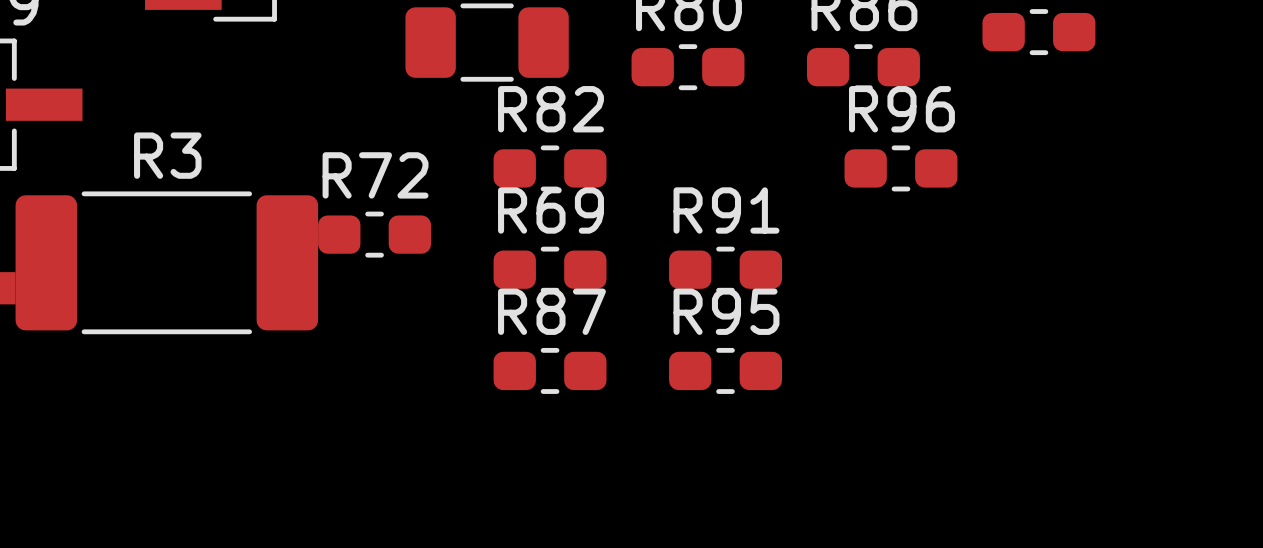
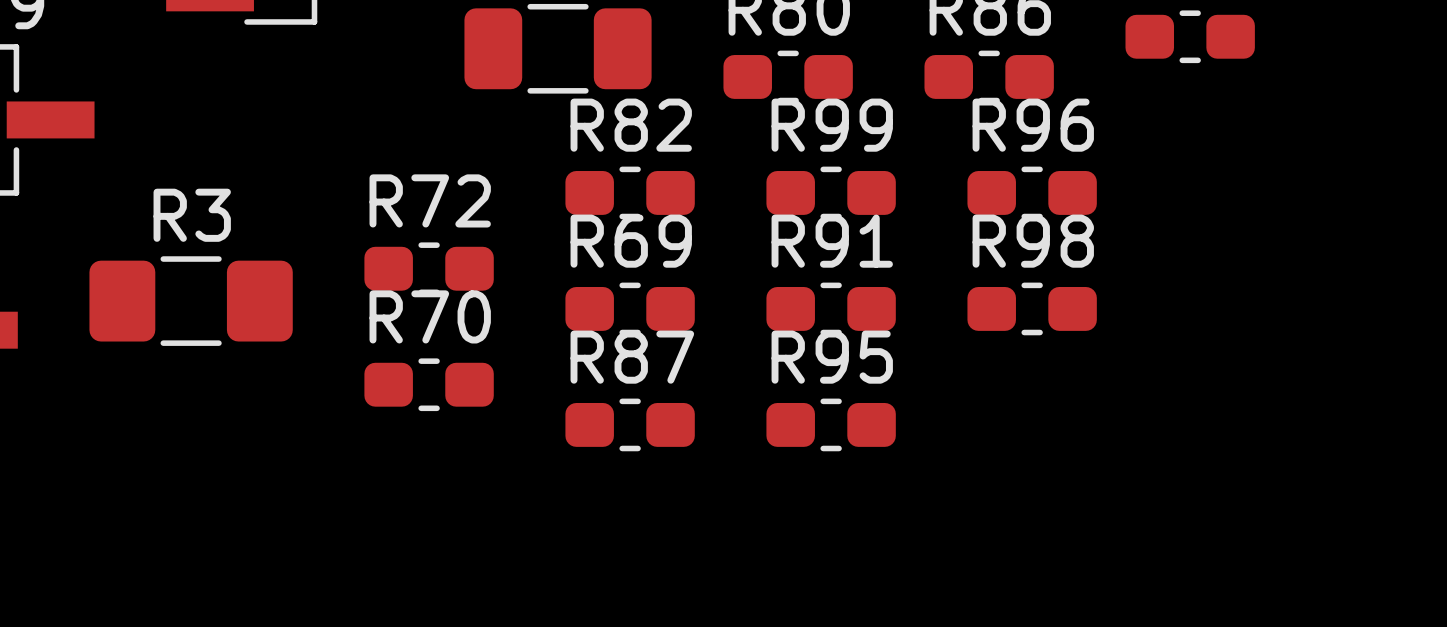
R99: none -> (831, 192)
R3 footprint: [15, 191, 319, 335] -> [89, 256, 293, 346]
R98: none -> (1032, 308)
R70: none -> (429, 384)

